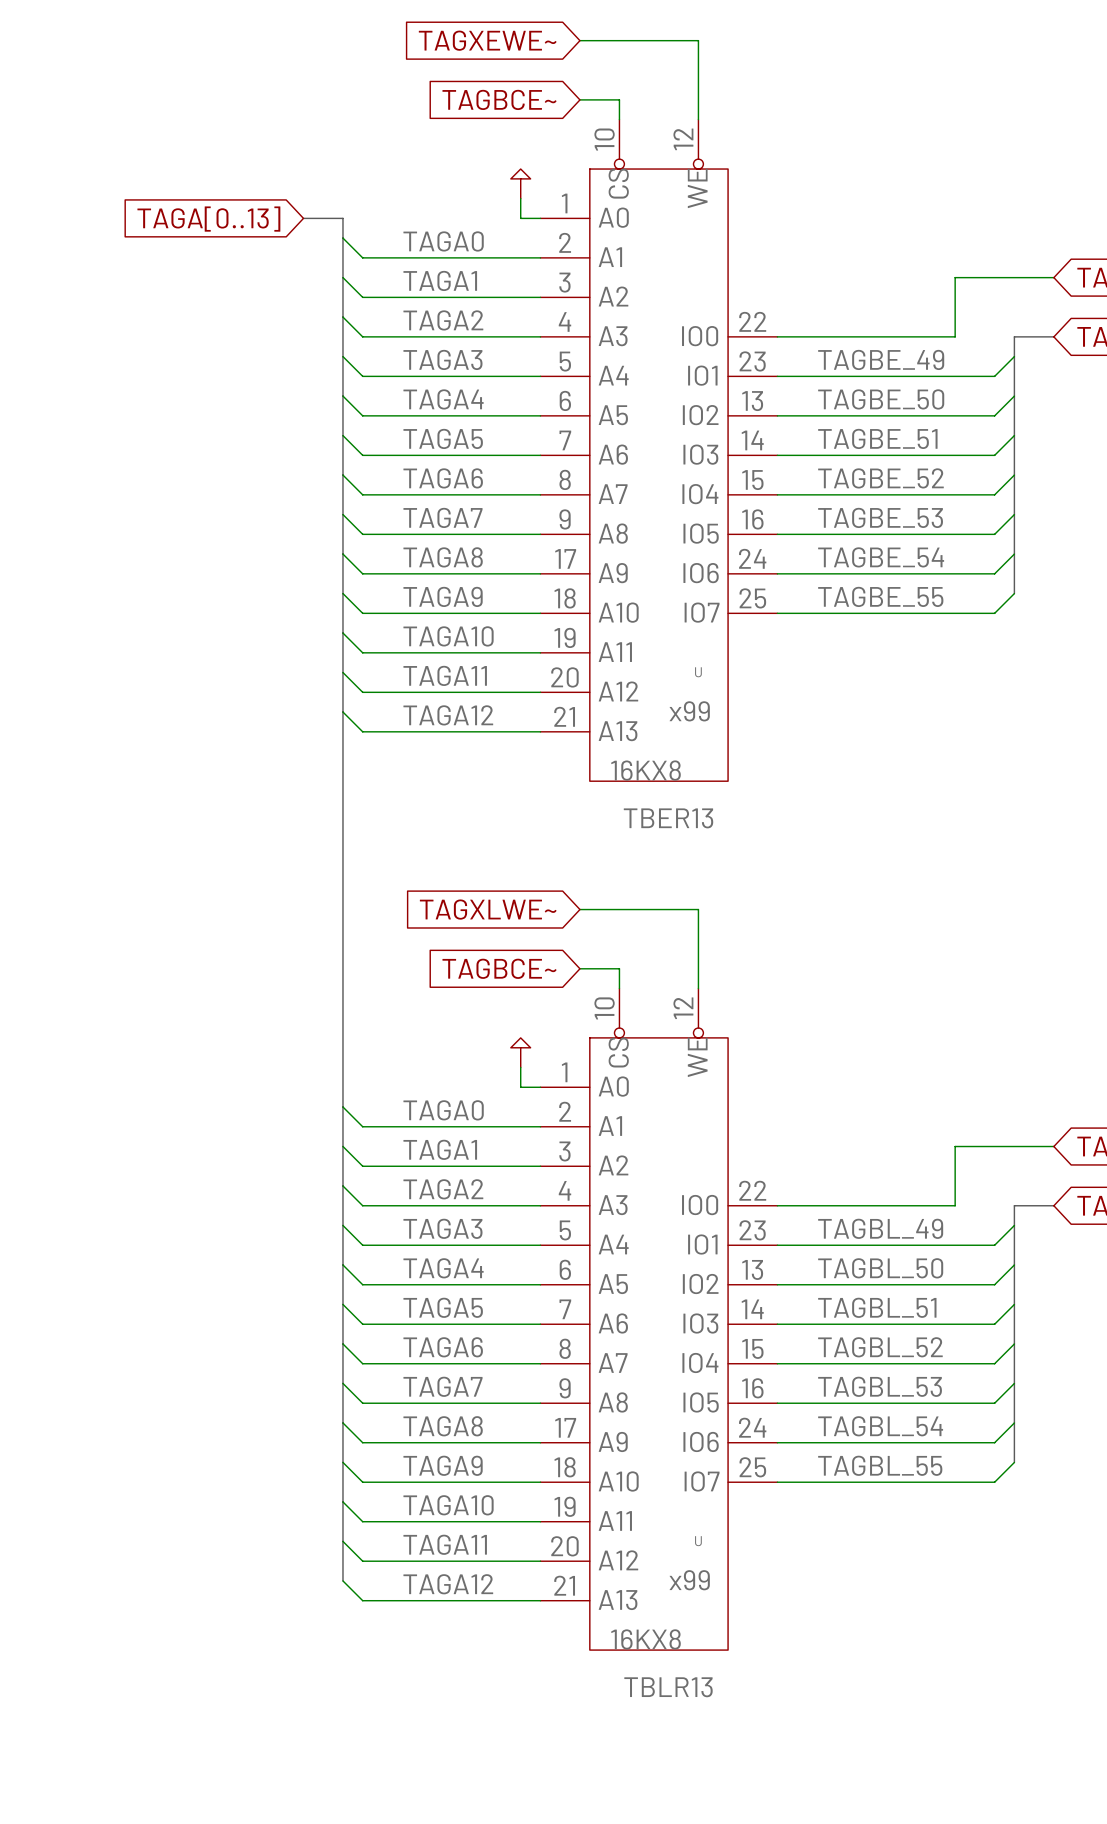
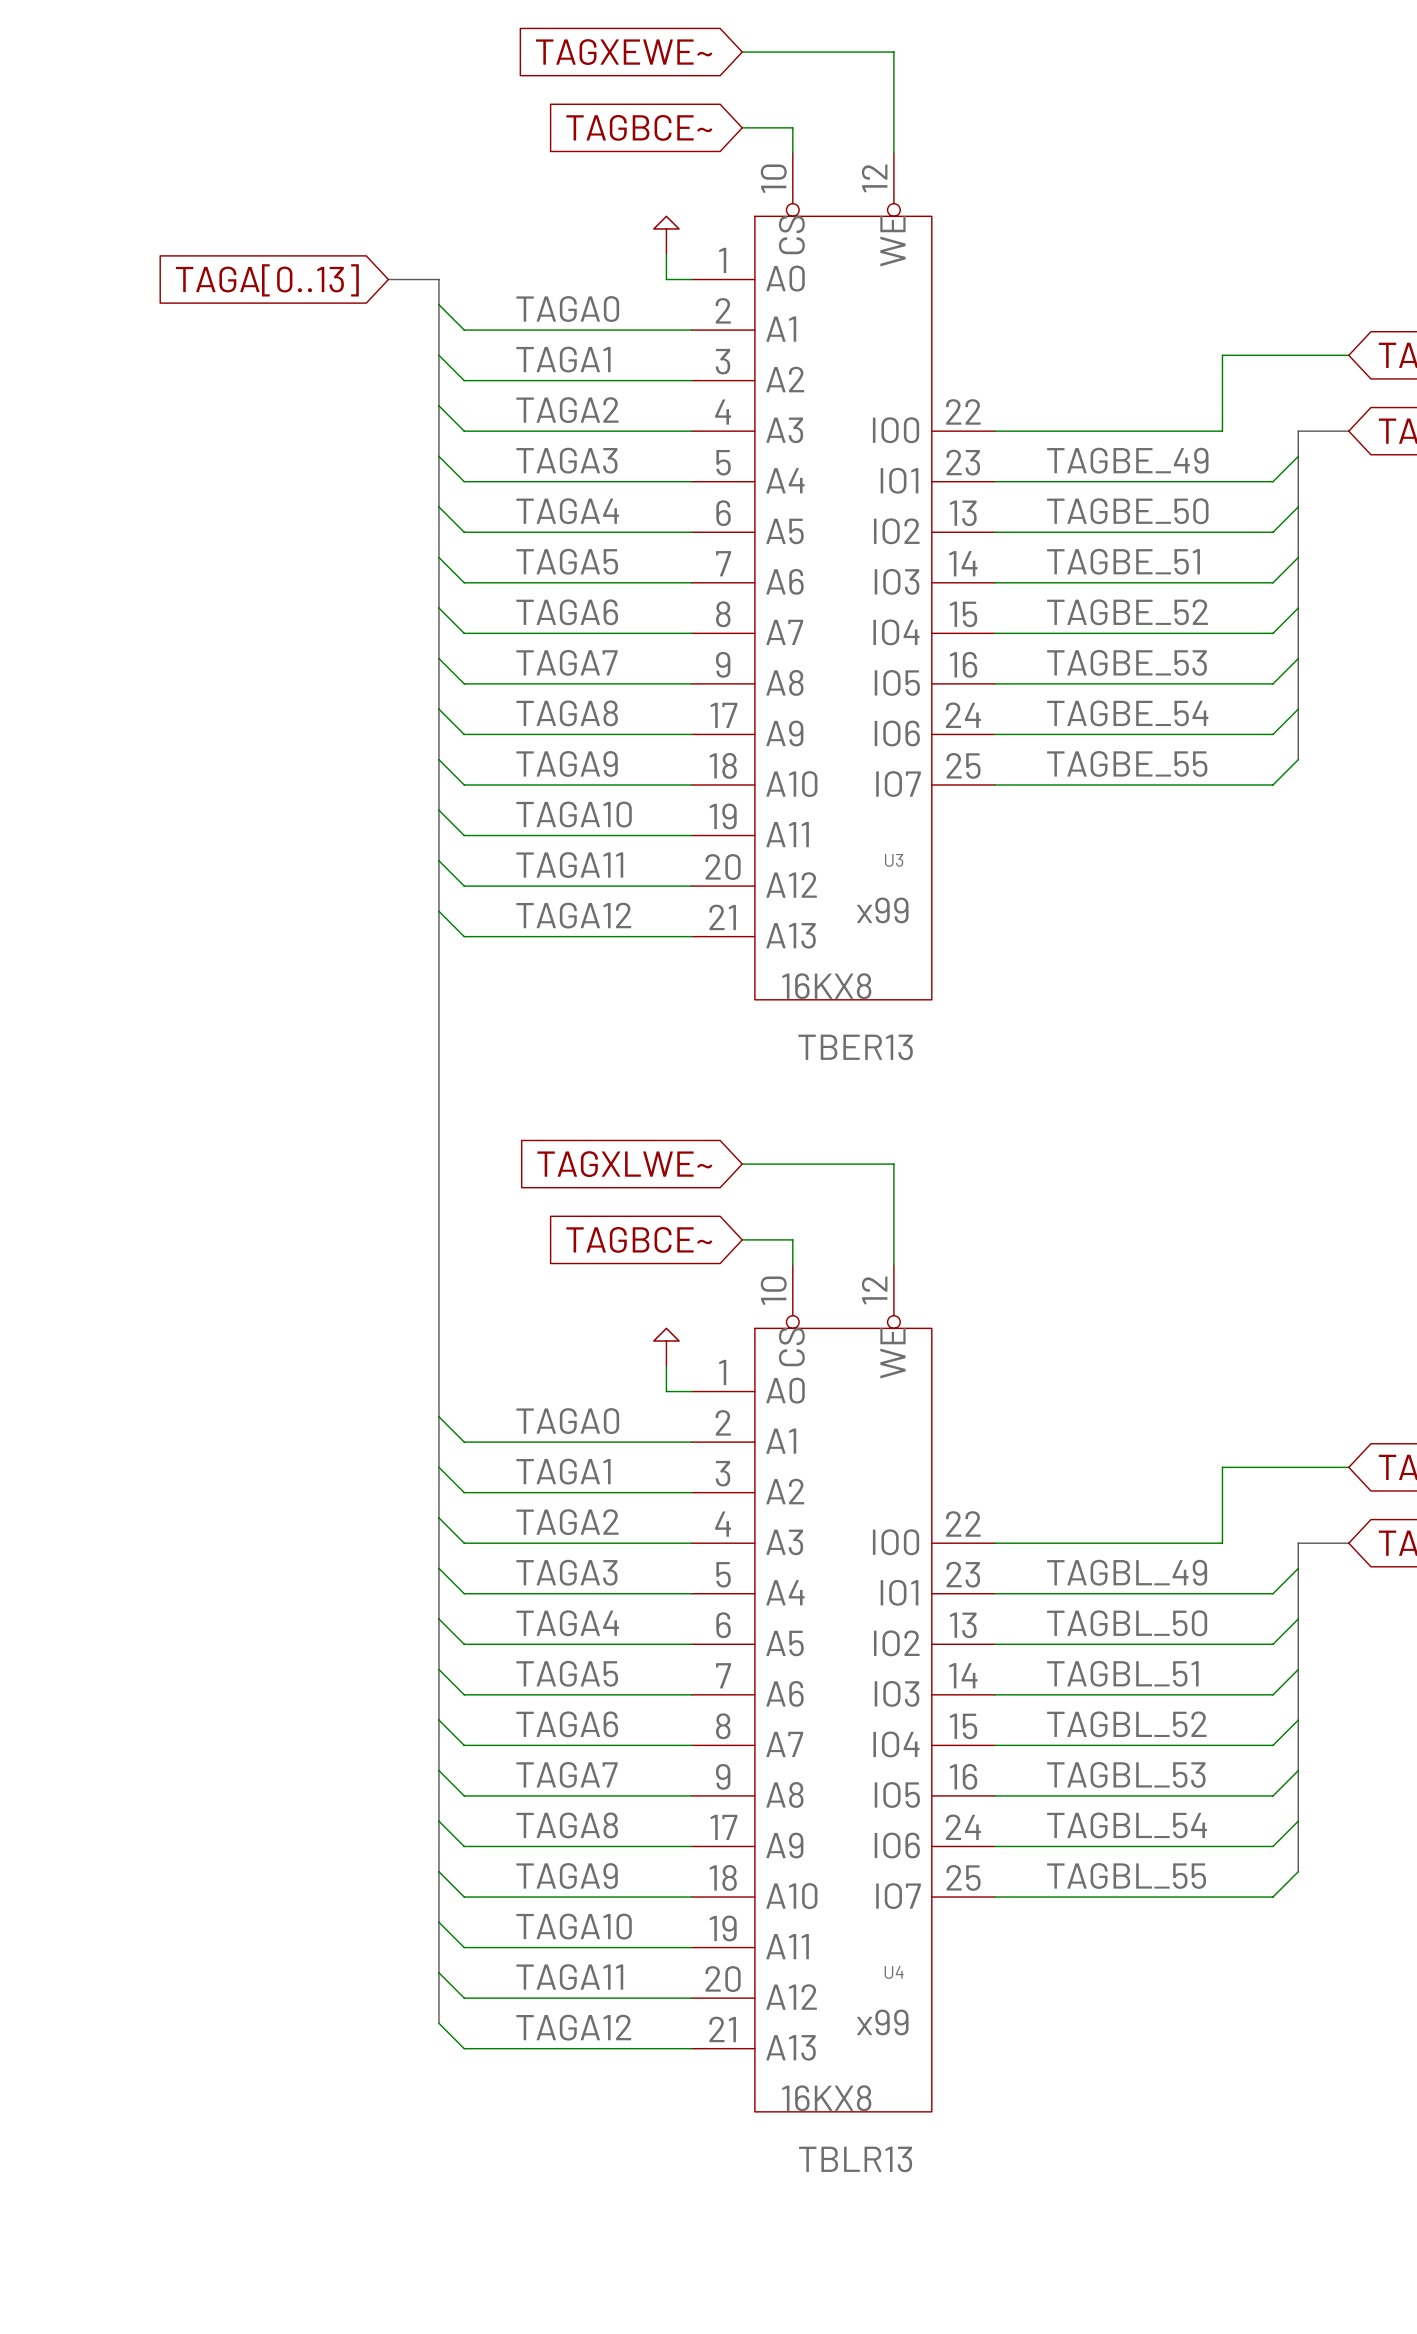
U name: U (698, 672) -> U3 (894, 860)
U name: U (698, 1541) -> U4 (894, 1972)

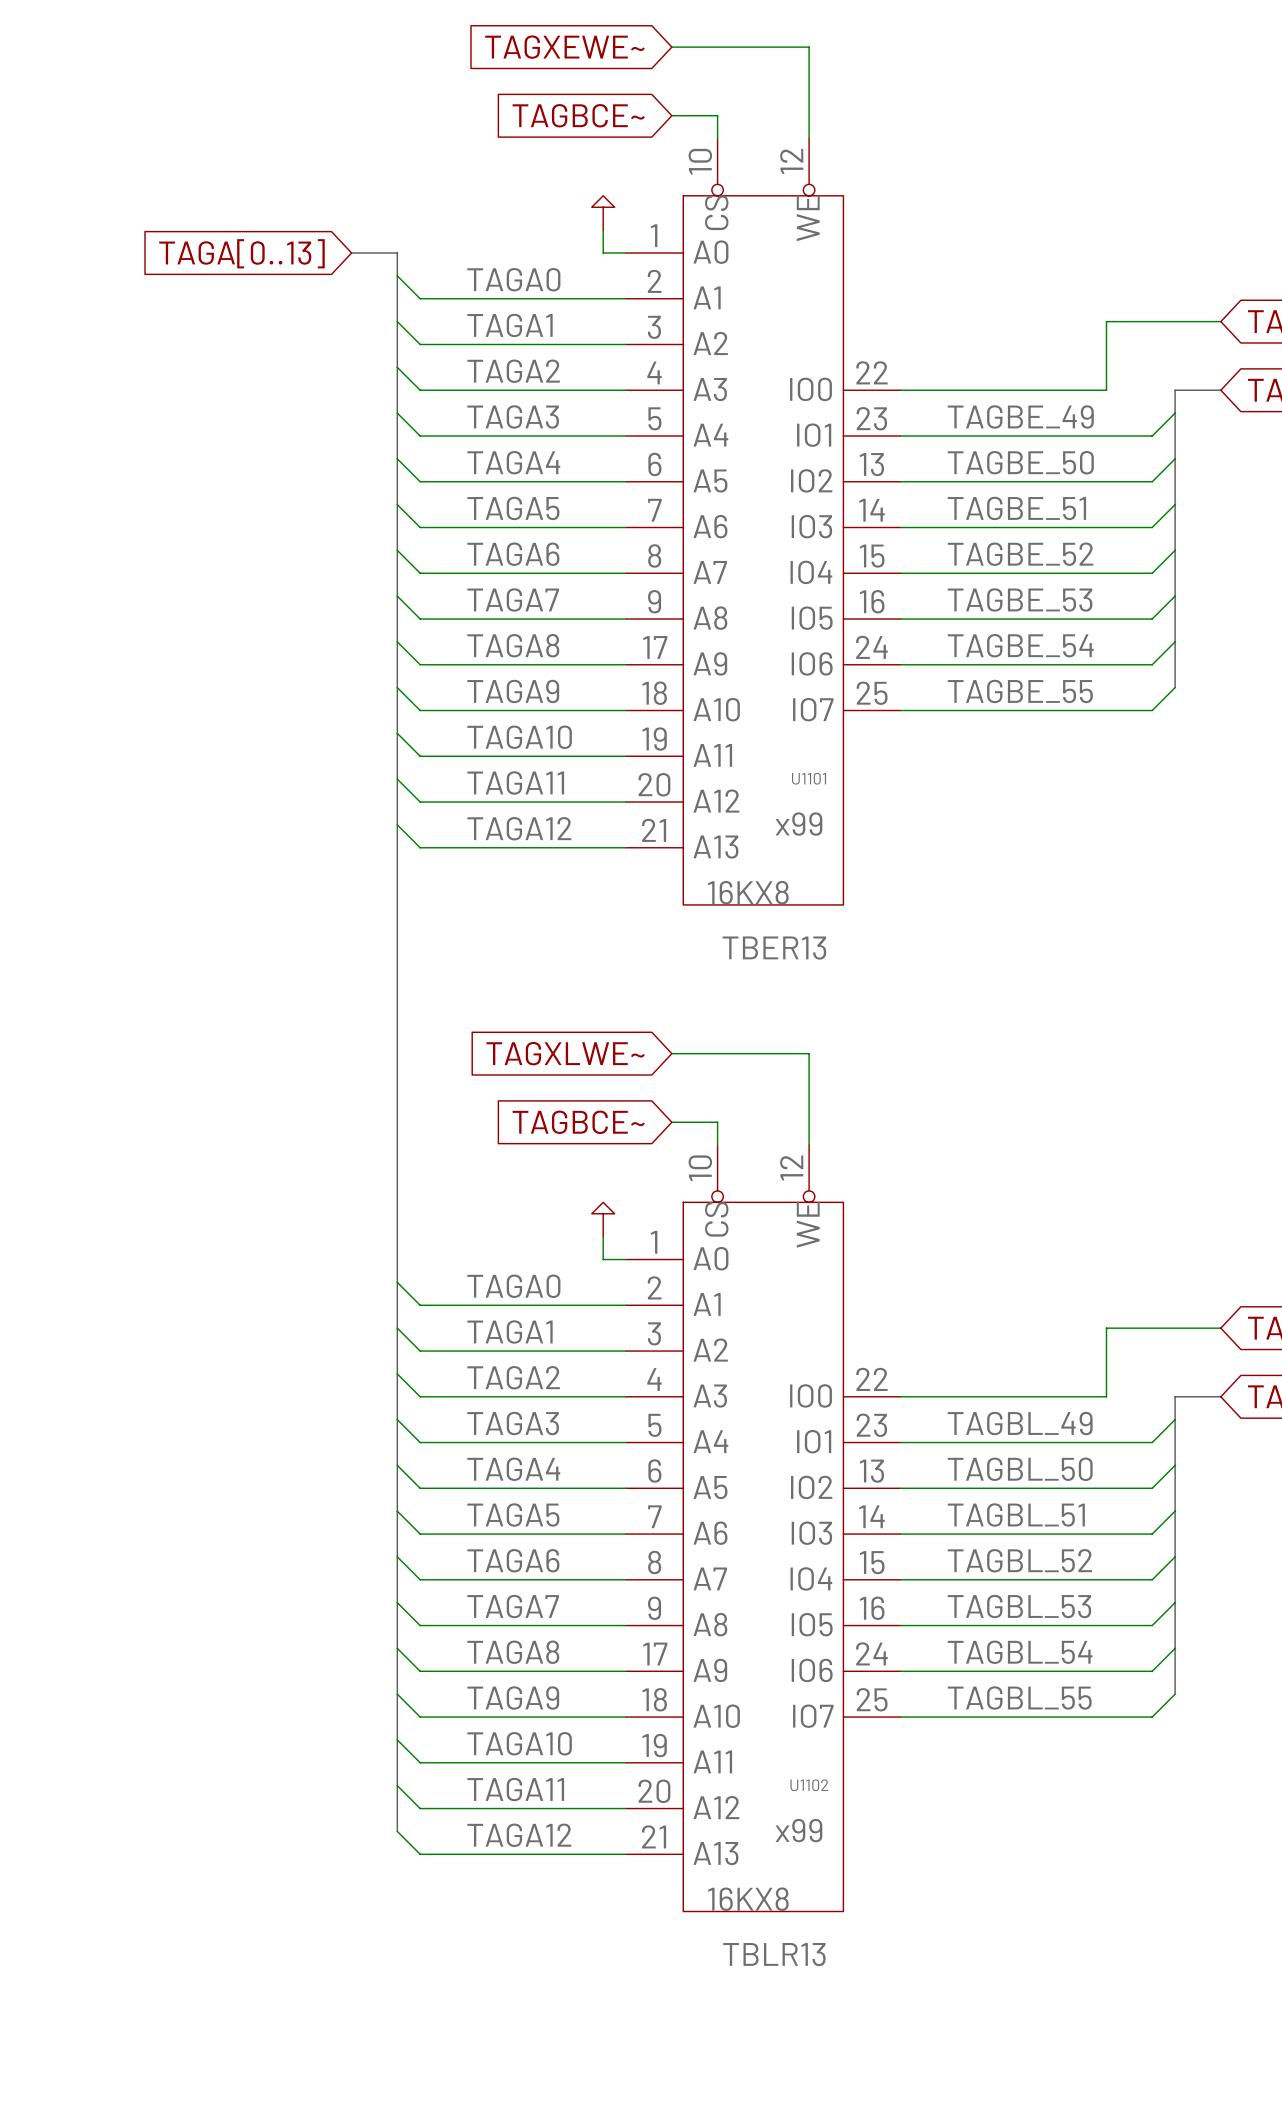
U3 name: U3 (894, 860) -> U1101 (809, 778)
U4 name: U4 (894, 1972) -> U1102 (809, 1785)

